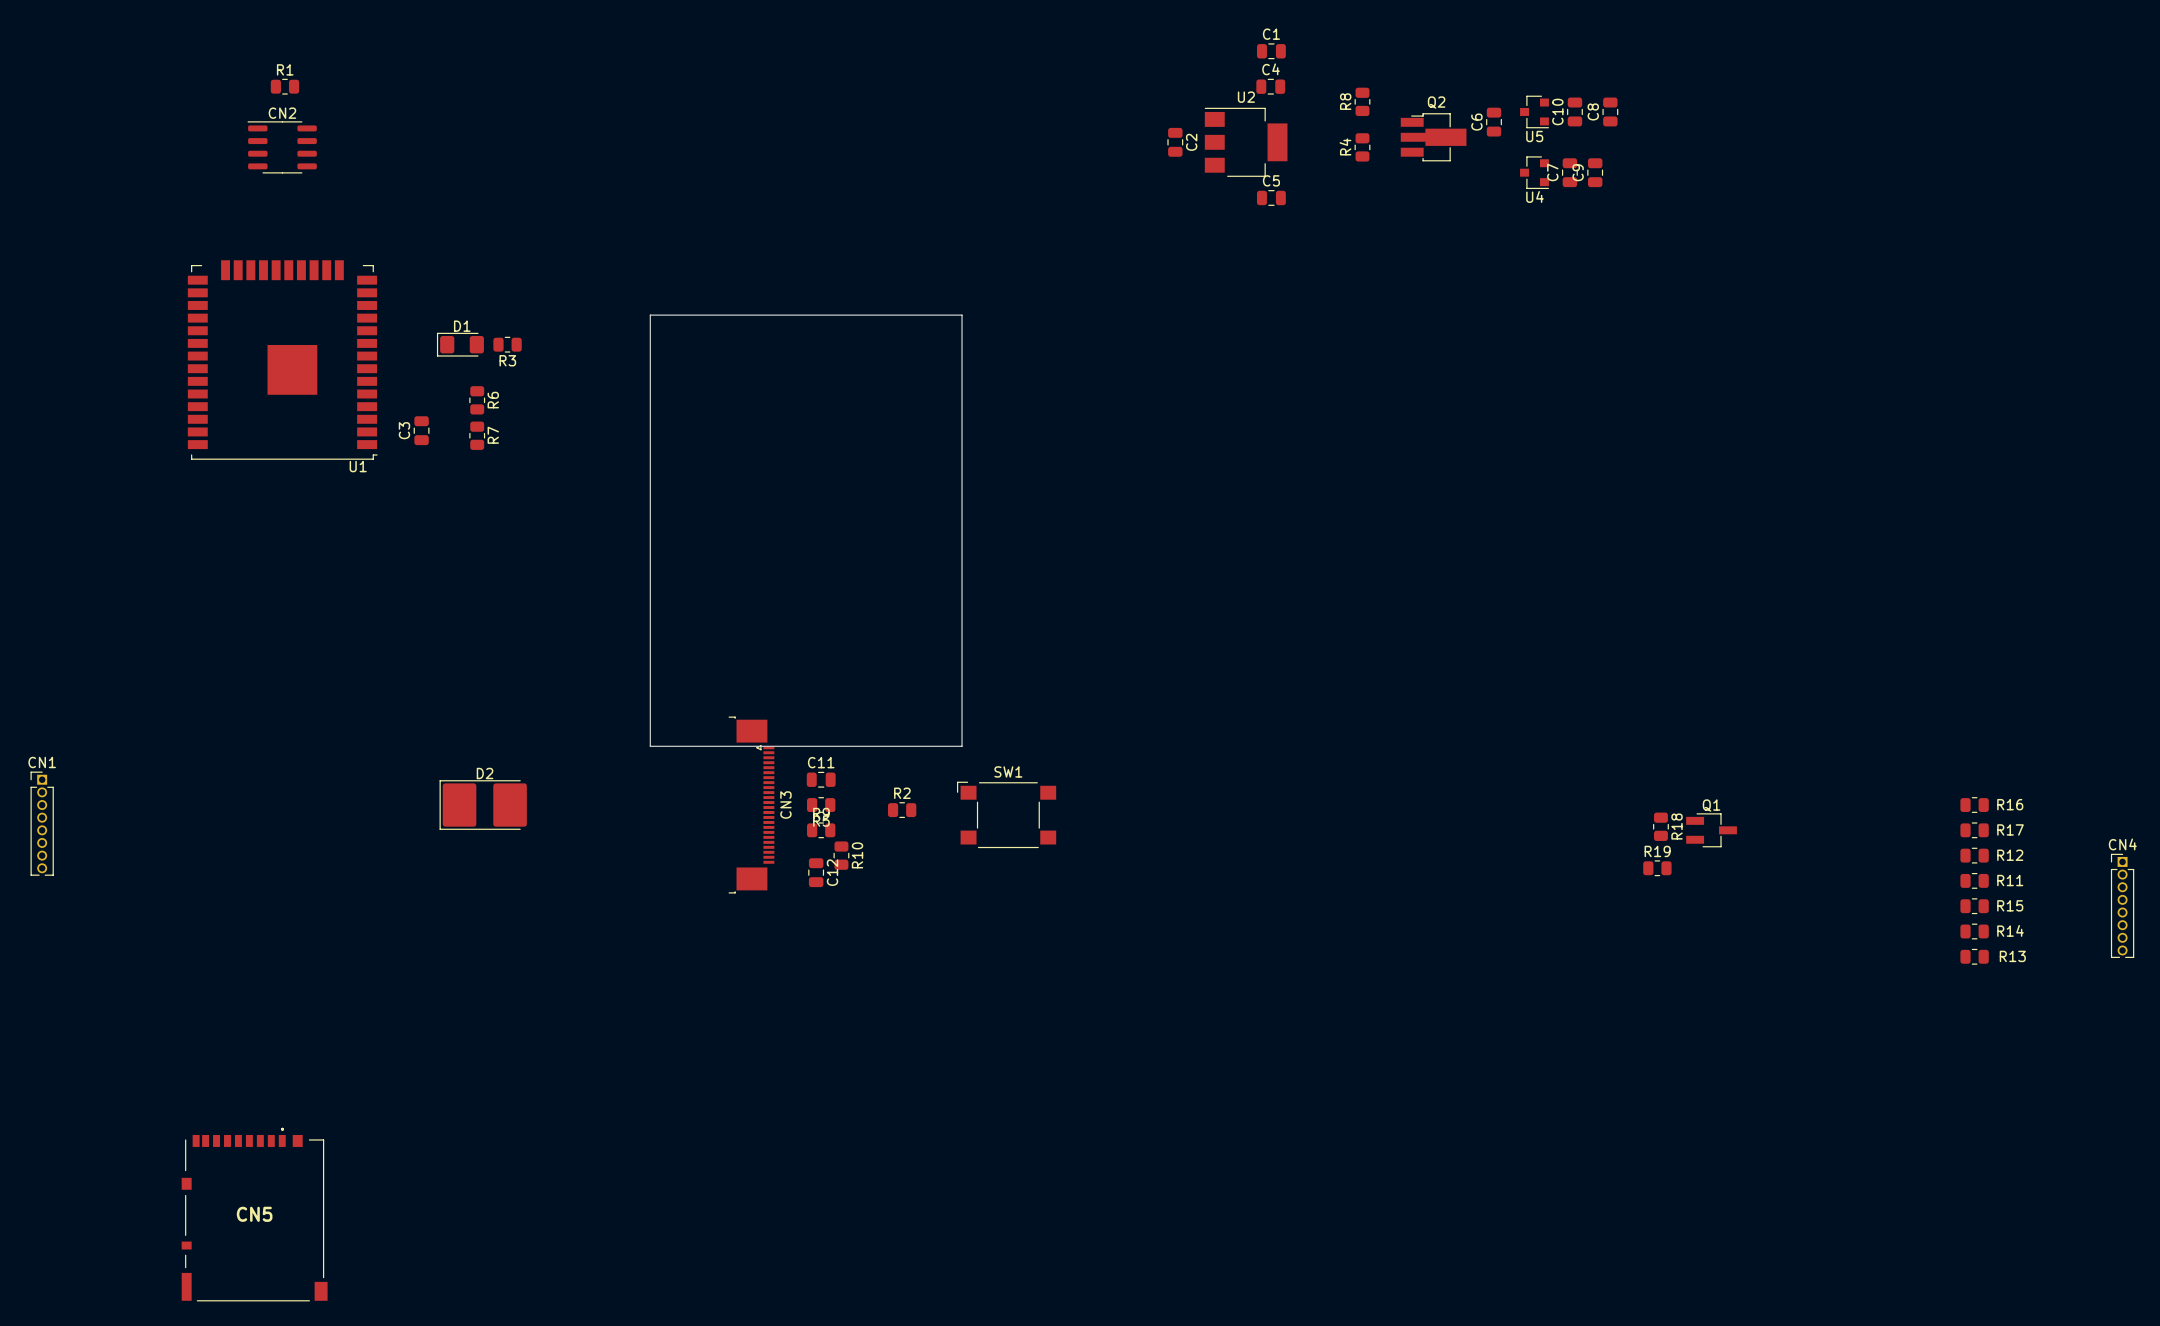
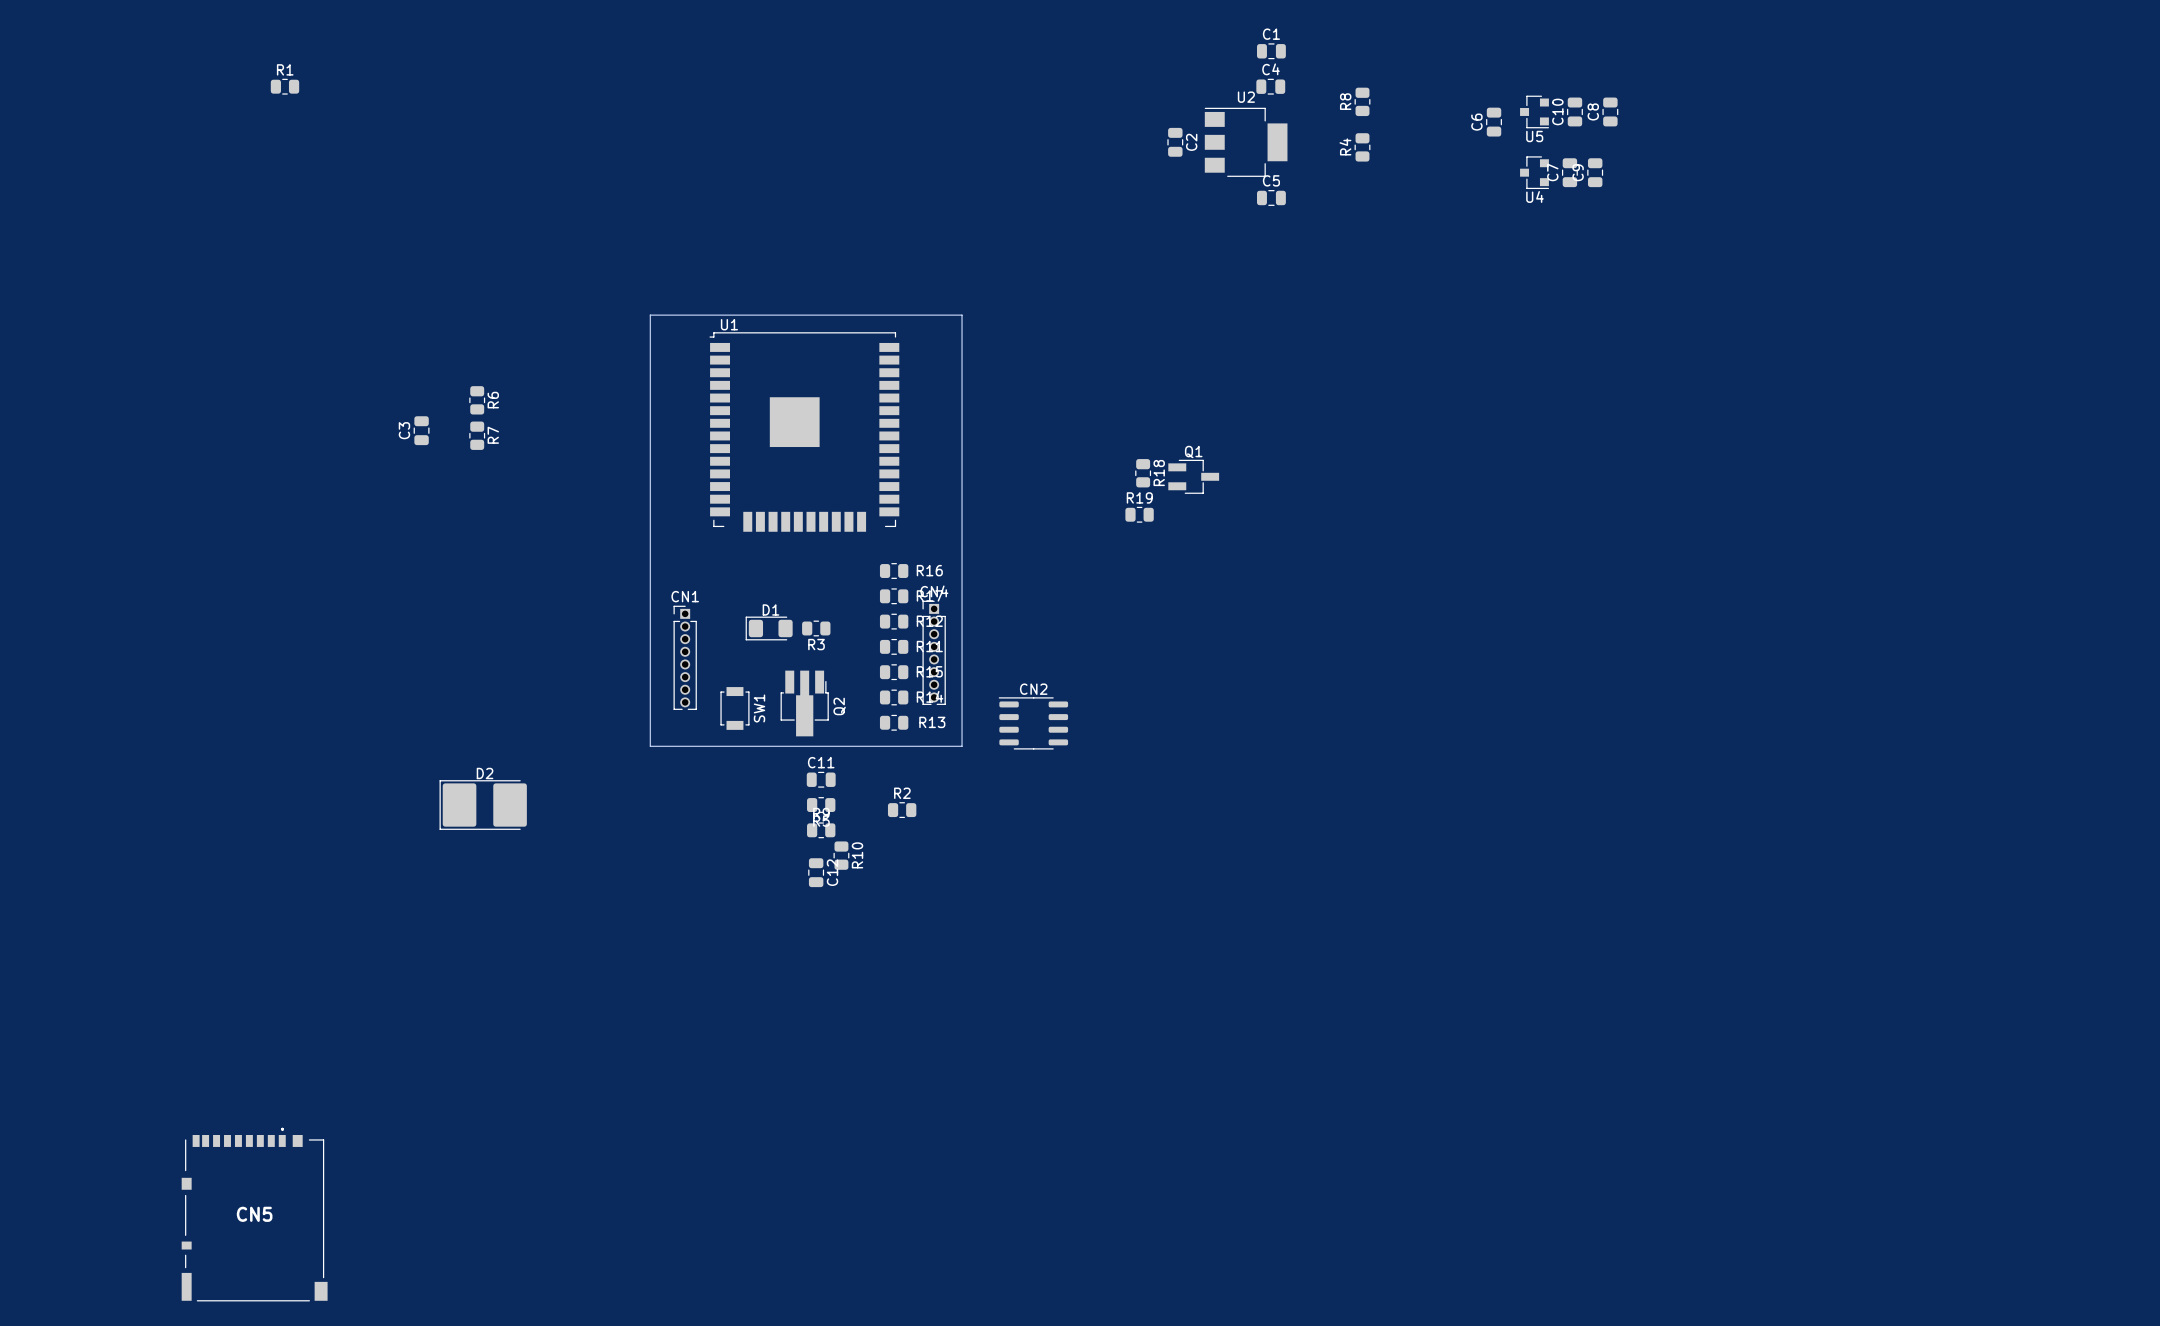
Q2 rotation: 0° (1433, 137) -> 90° clockwise (804, 703)
Q2 position: (1433, 137) -> (804, 703)
CN2 position: (282, 147) -> (1033, 723)
D1 position: (460, 344) -> (769, 628)
R3 position: (507, 344) -> (816, 628)
U1 rotation: 0° (282, 360) -> 180° (804, 432)
U1 position: (282, 360) -> (804, 432)
SW1 name position: SW1 (1008, 771) -> SW1 (759, 708)
SW1 footprint: [957, 781, 1057, 849] -> [720, 687, 750, 730]
CN3: (751, 805) -> none
R16 position: (1974, 805) -> (894, 571)
CN1 position: (42, 823) -> (685, 657)
R18 position: (1660, 826) -> (1143, 473)
Q1 position: (1711, 830) -> (1193, 476)
R17 position: (1974, 830) -> (894, 596)
R12 position: (1974, 855) -> (894, 621)
R19 position: (1657, 868) -> (1139, 514)
R11 position: (1974, 880) -> (894, 646)
CN4 position: (2122, 905) -> (934, 652)
R15 position: (1974, 906) -> (894, 672)
R14 position: (1974, 931) -> (894, 697)
R13 position: (1974, 956) -> (894, 722)

